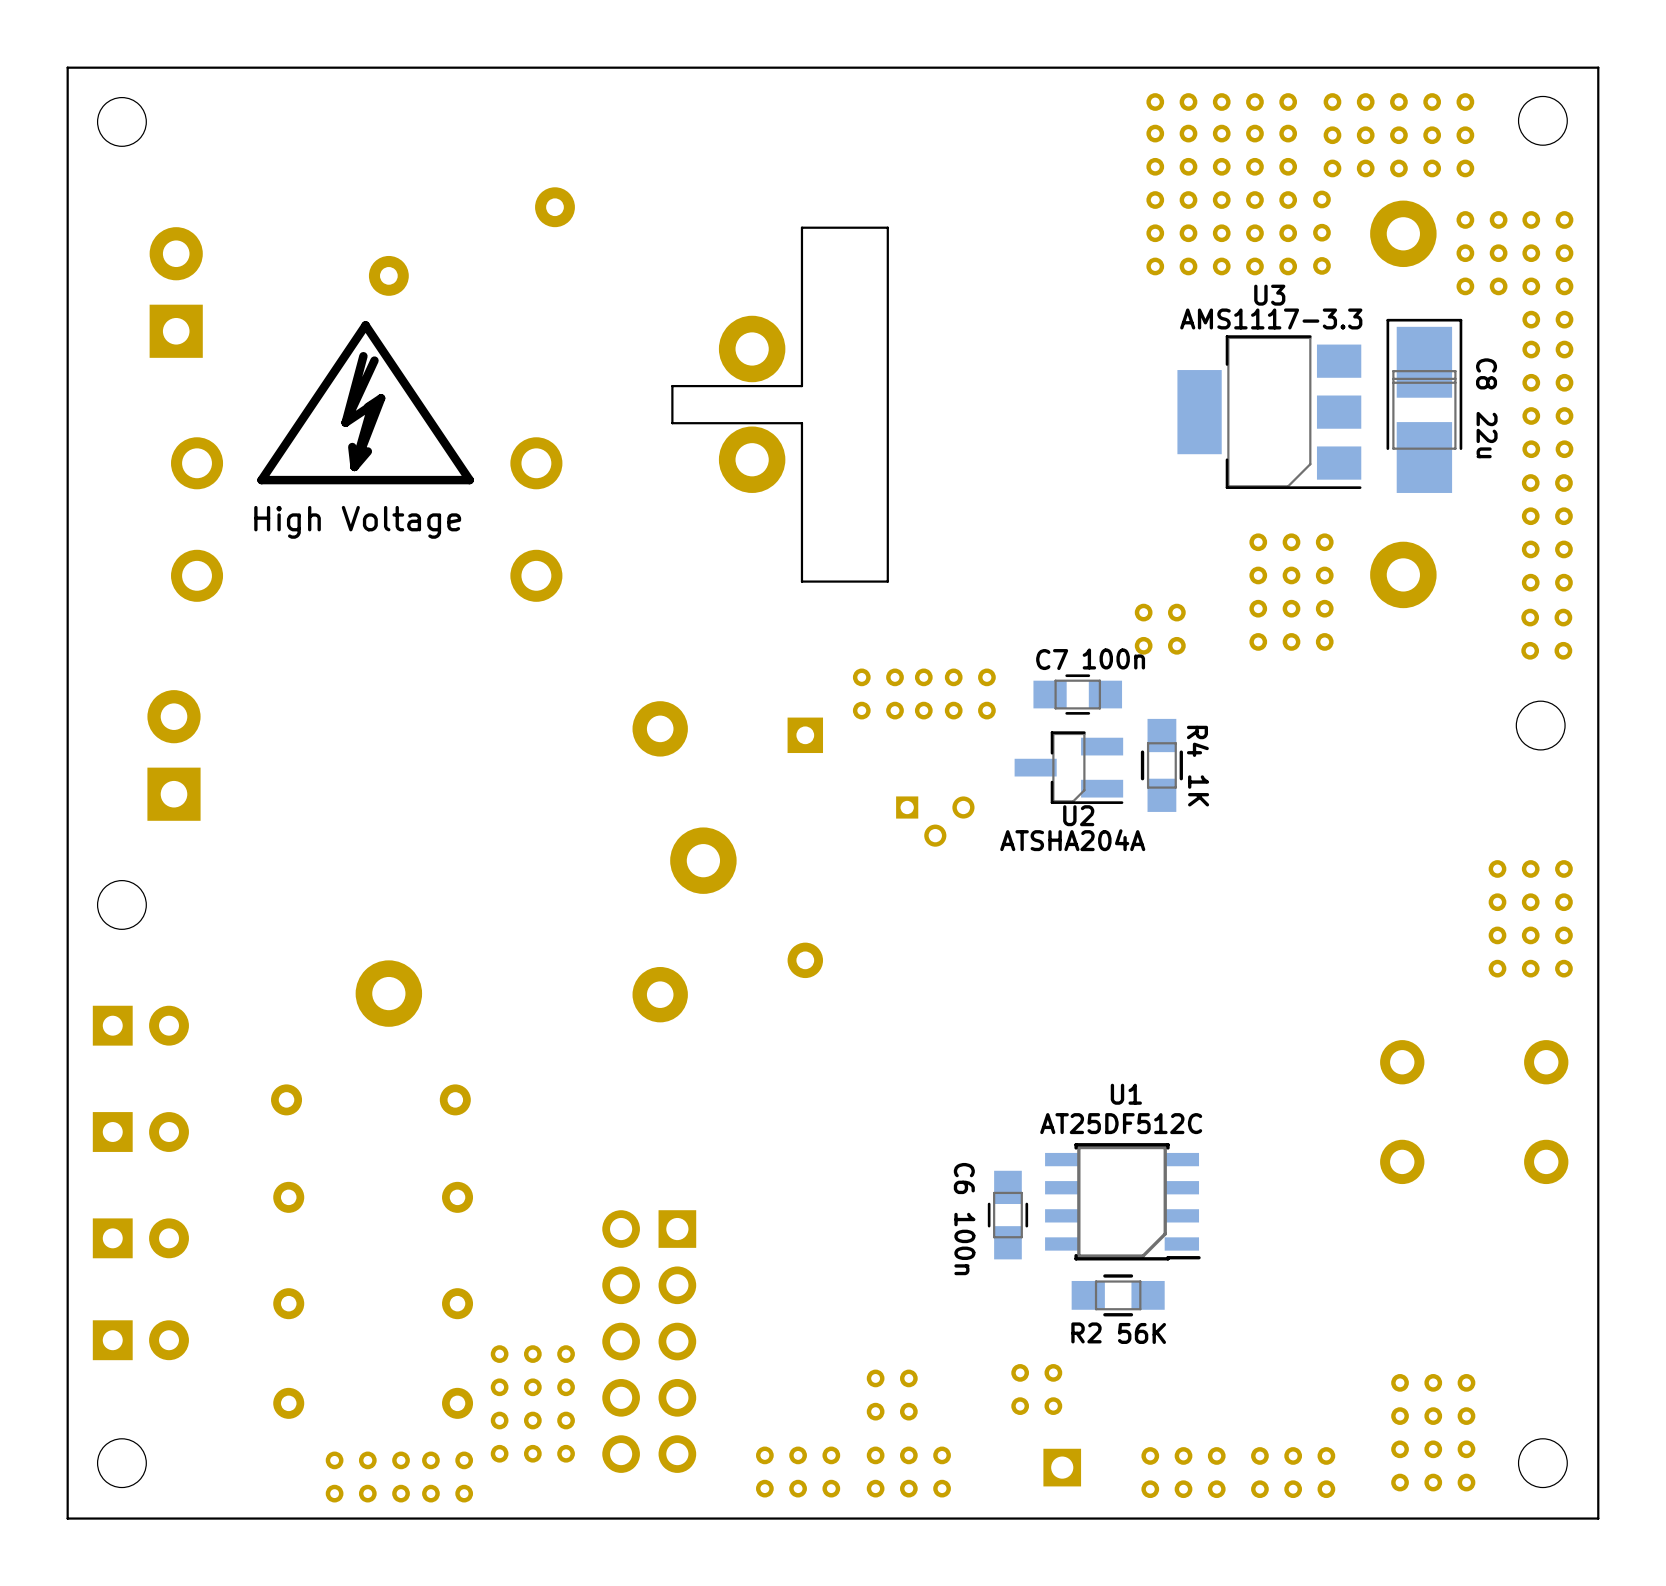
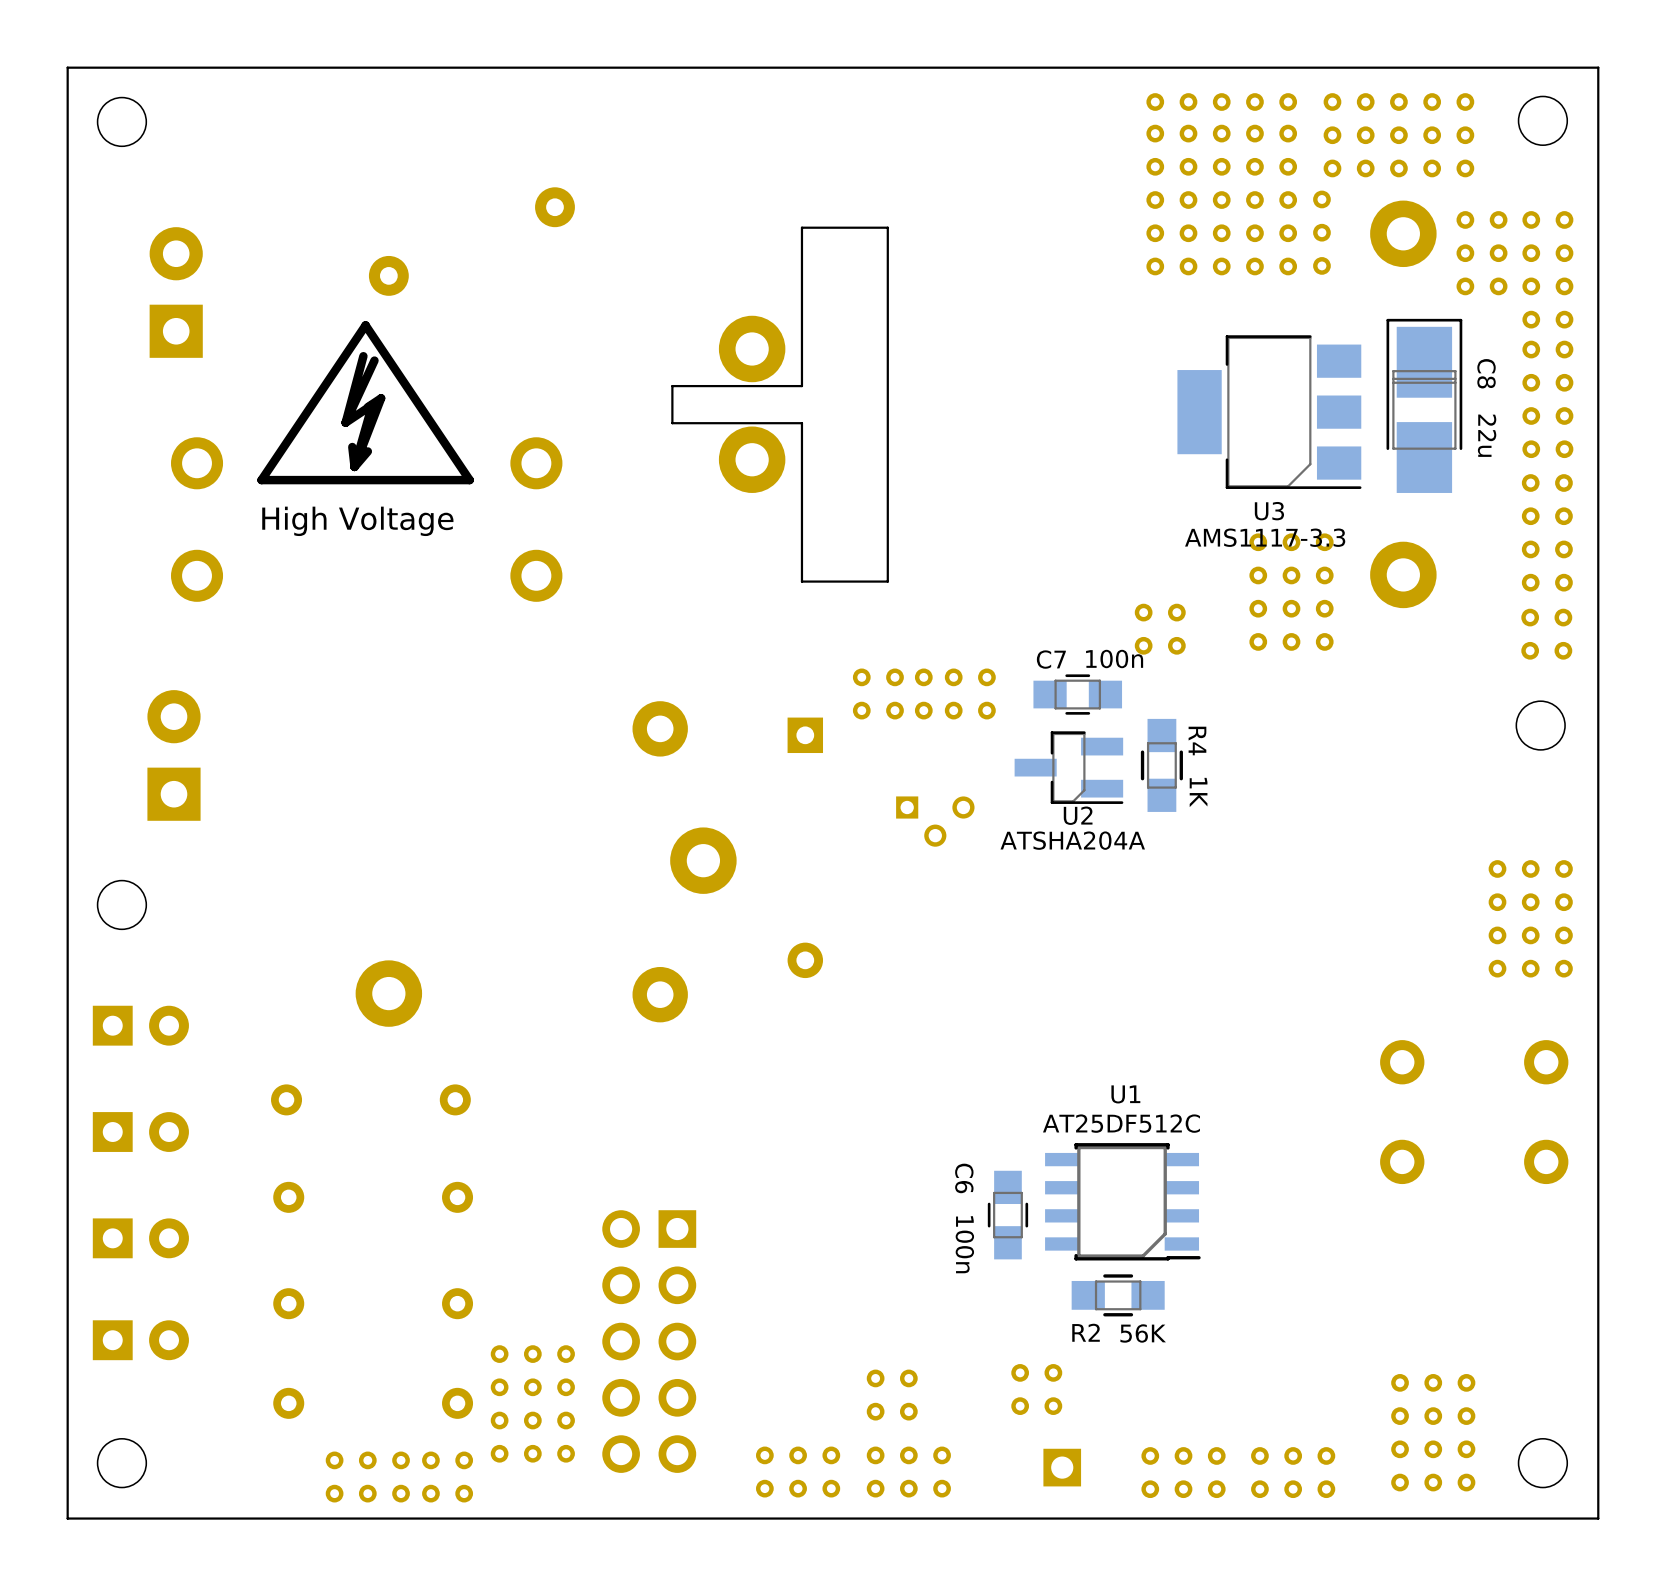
U3 name position: U3 (1269, 295) -> U3 (1269, 511)
U3 value position: AMS1117-3.3 (1271, 318) -> AMS1117-3.3 (1265, 537)

